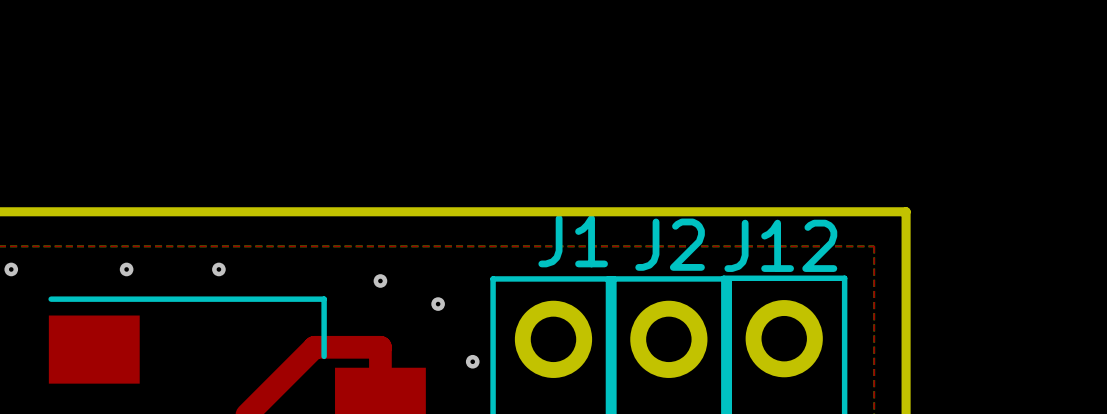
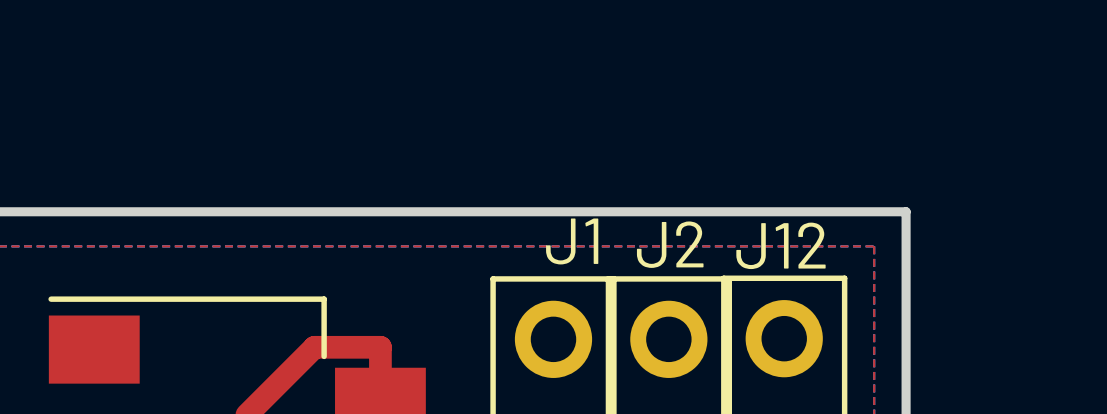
via: (11, 269) -> none
via: (126, 269) -> none
via: (218, 269) -> none
via: (380, 280) -> none
via: (438, 304) -> none
via: (472, 361) -> none

